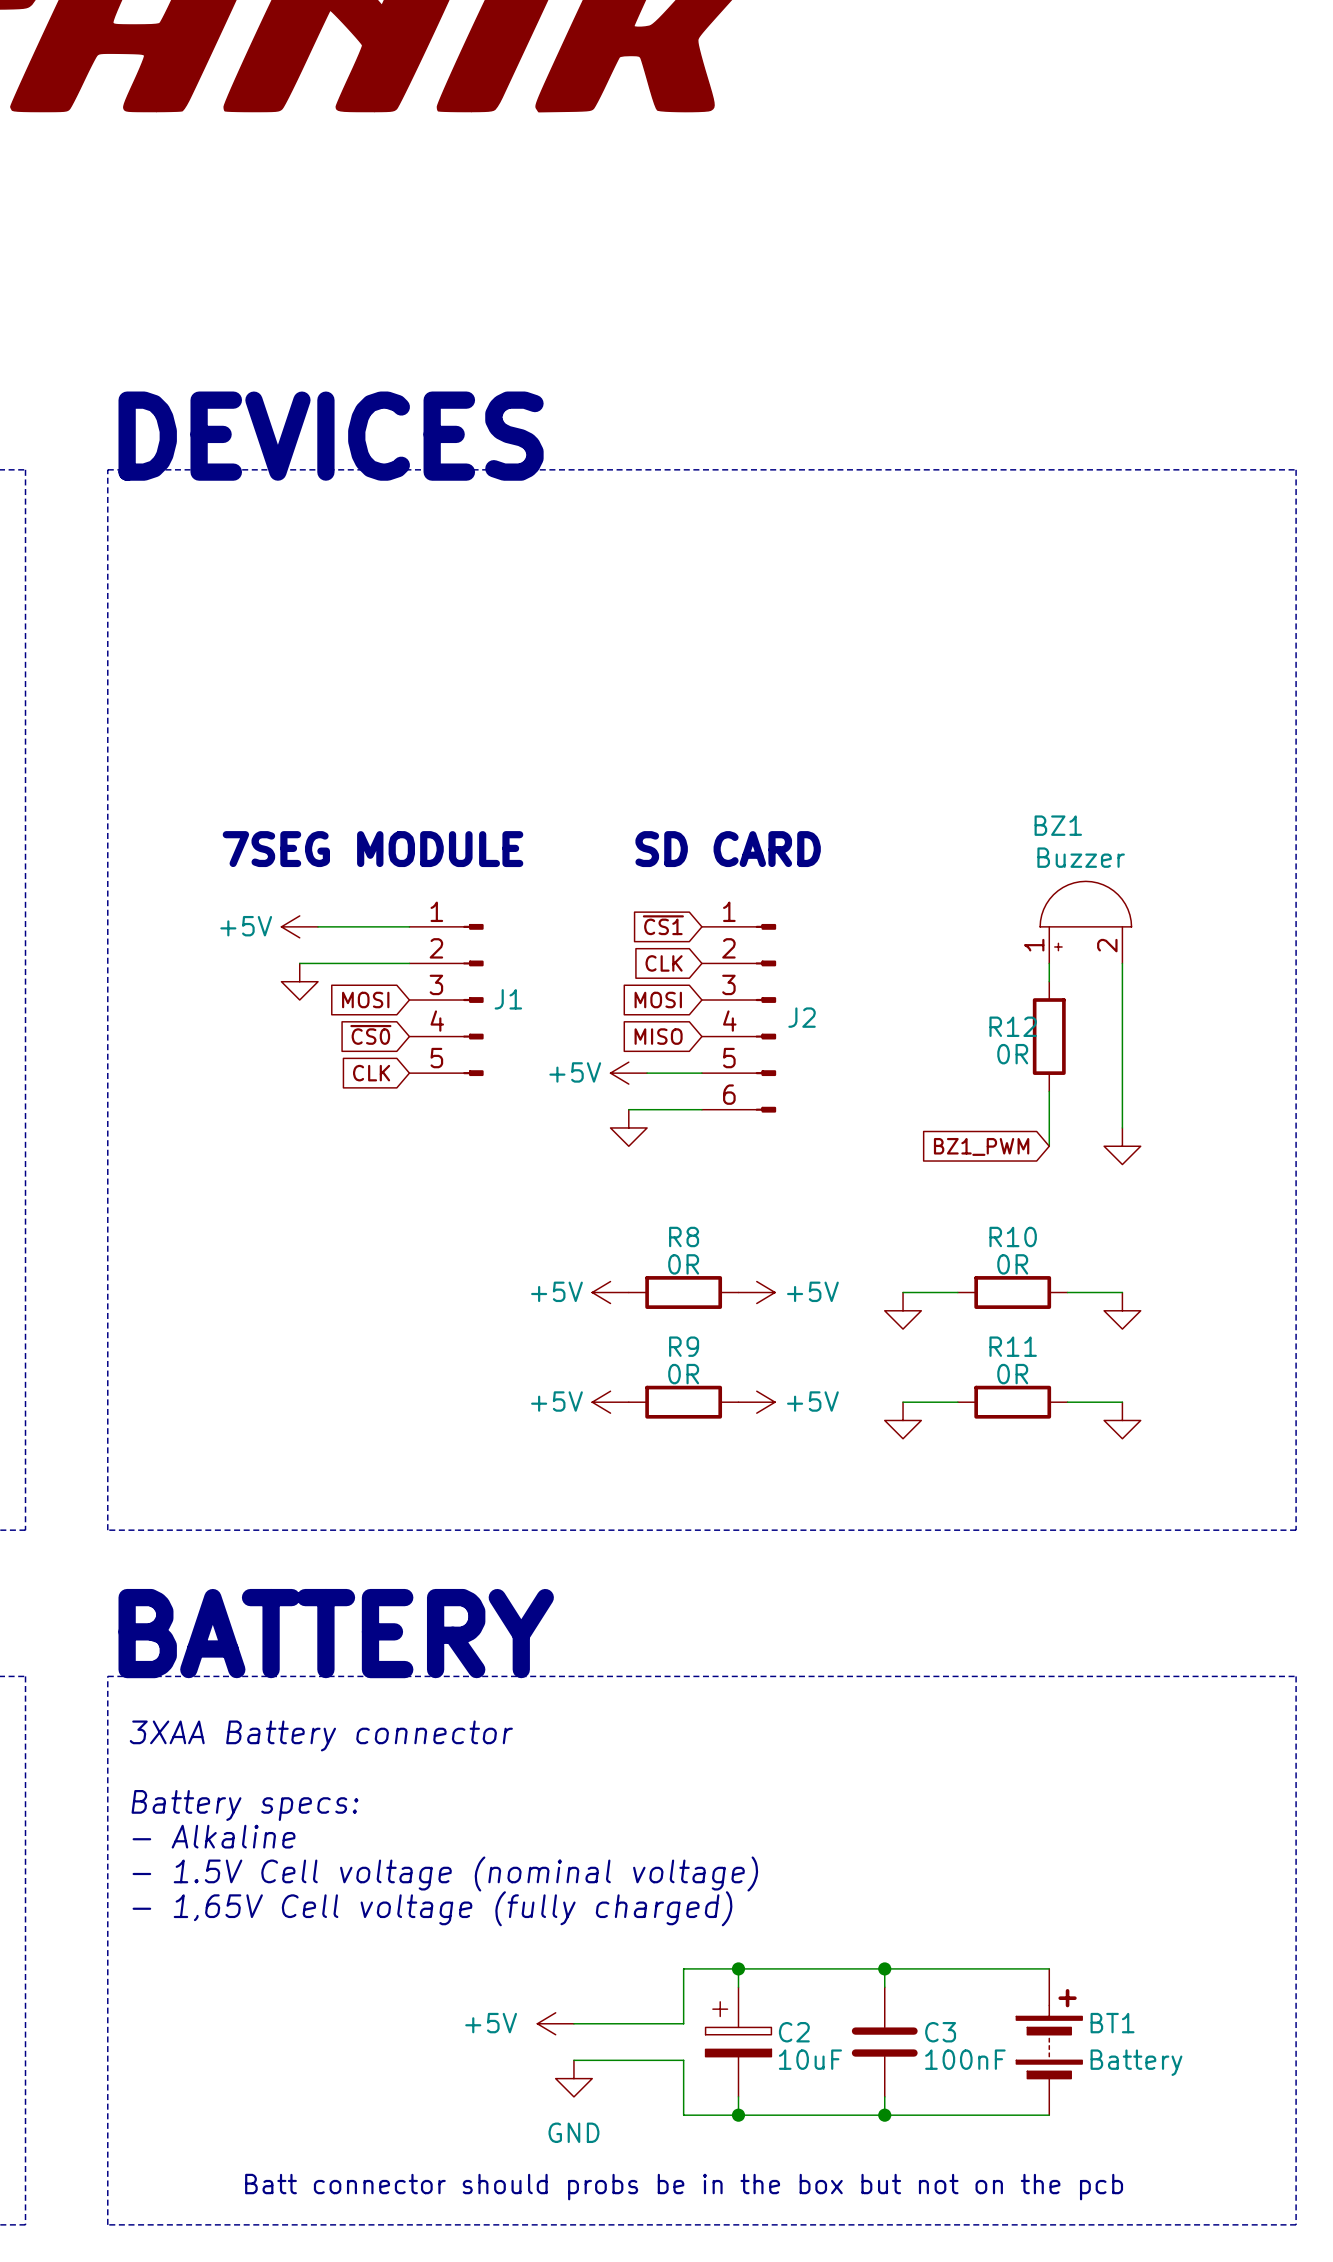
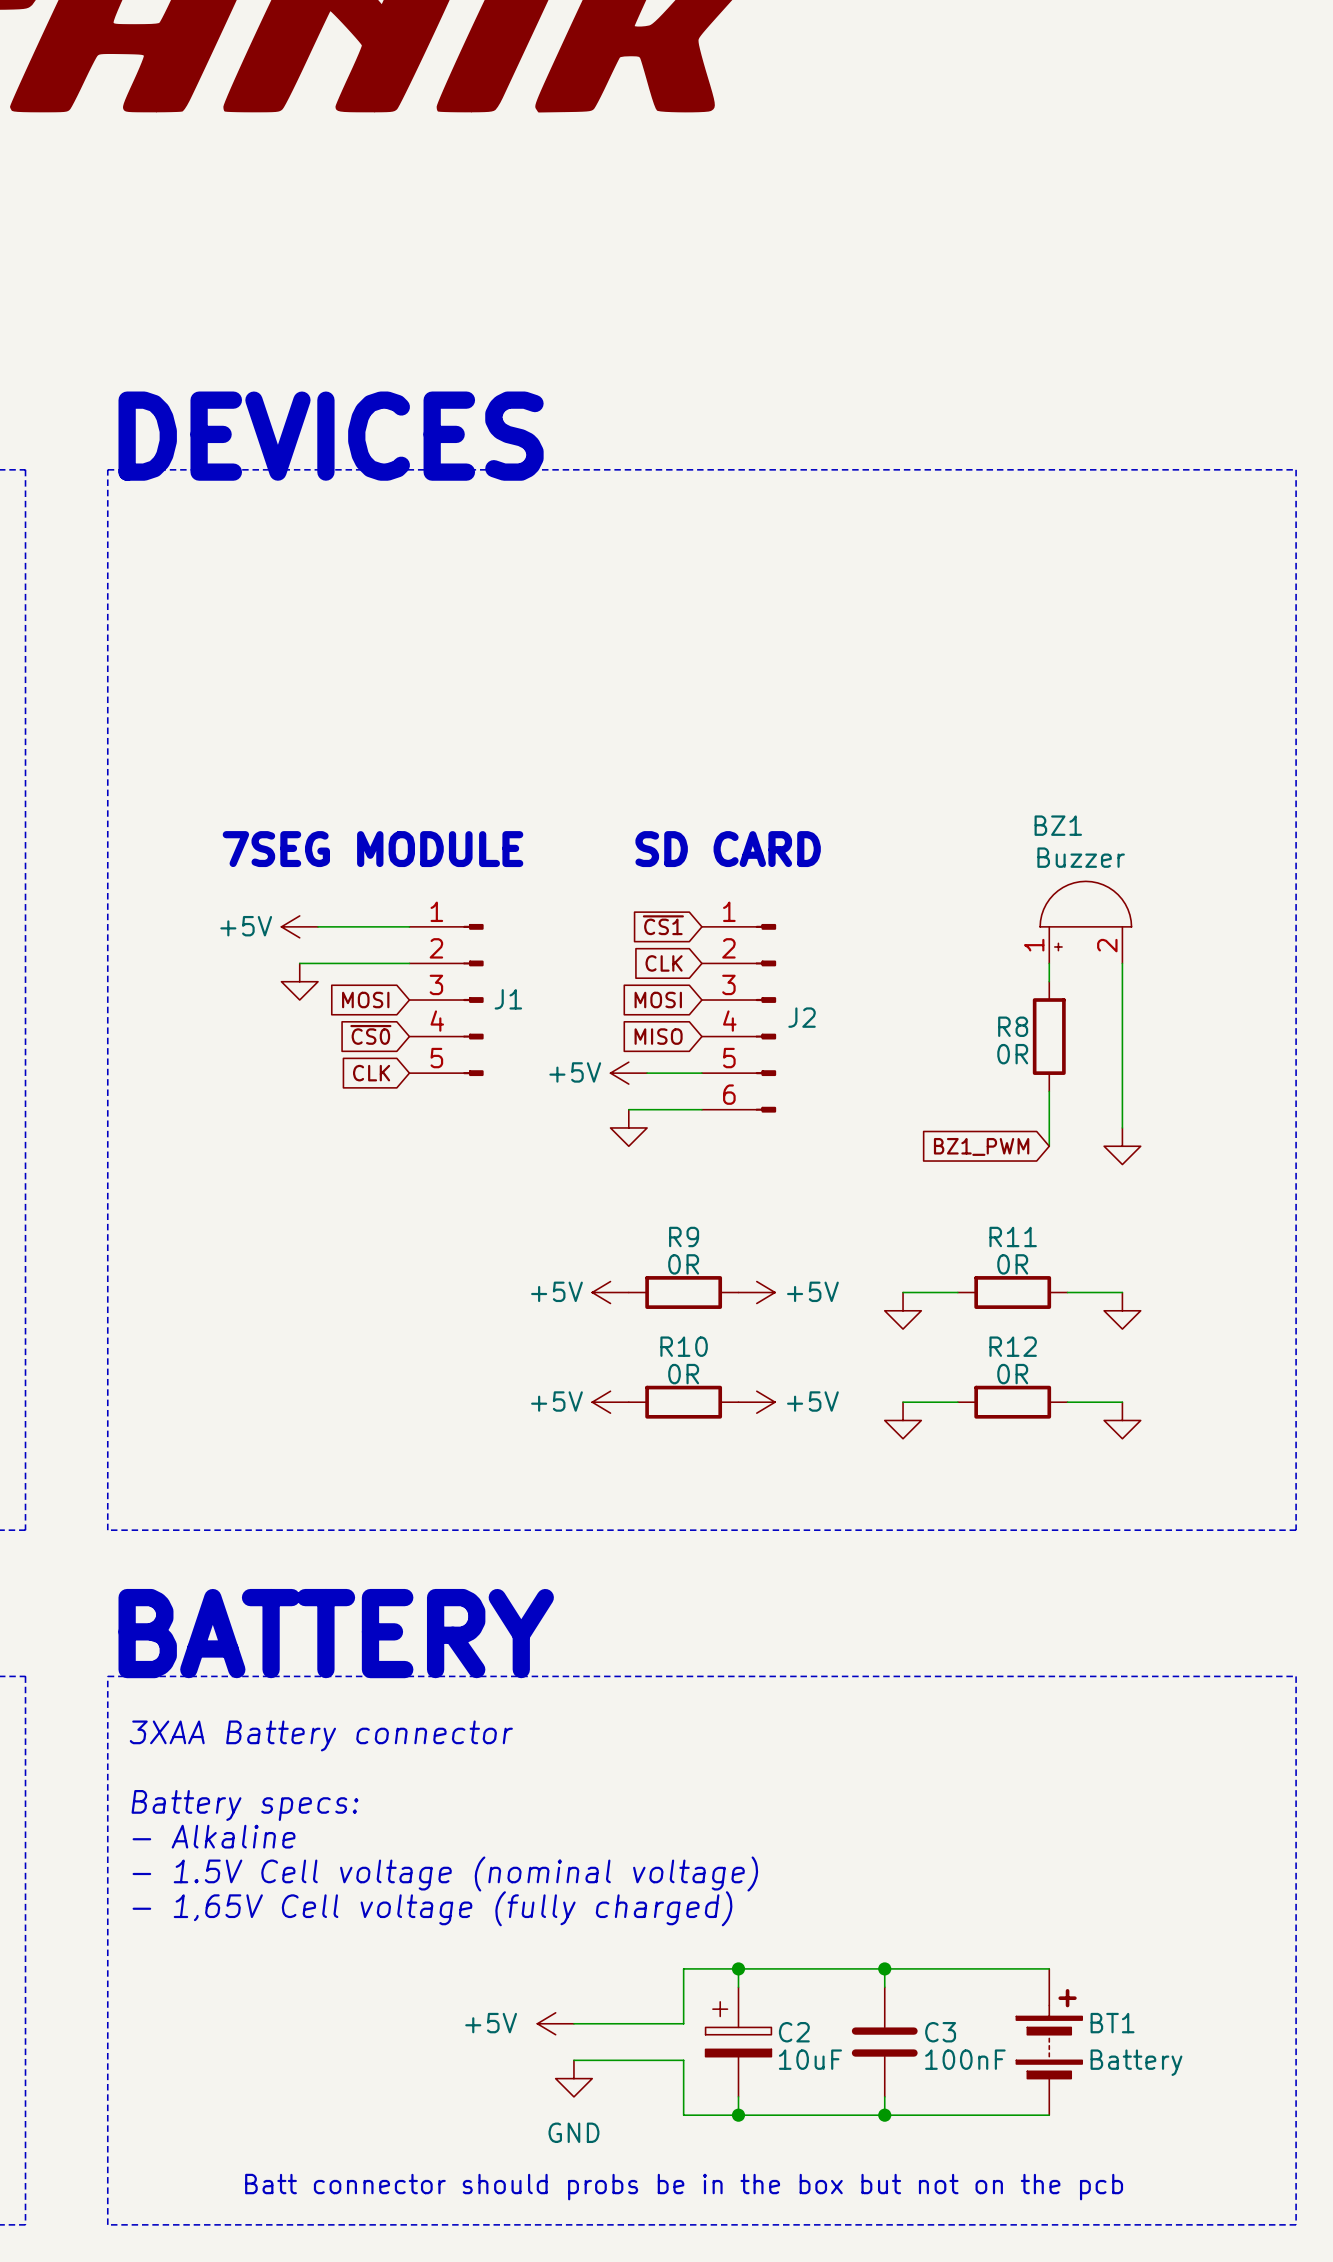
R12 name: R12 (1013, 1026) -> R8 (1013, 1026)
R8 name: R8 (684, 1236) -> R9 (684, 1236)
R10 name: R10 (1013, 1236) -> R11 (1013, 1236)
R9 name: R9 (684, 1346) -> R10 (684, 1346)
R11 name: R11 (1013, 1346) -> R12 (1013, 1346)

